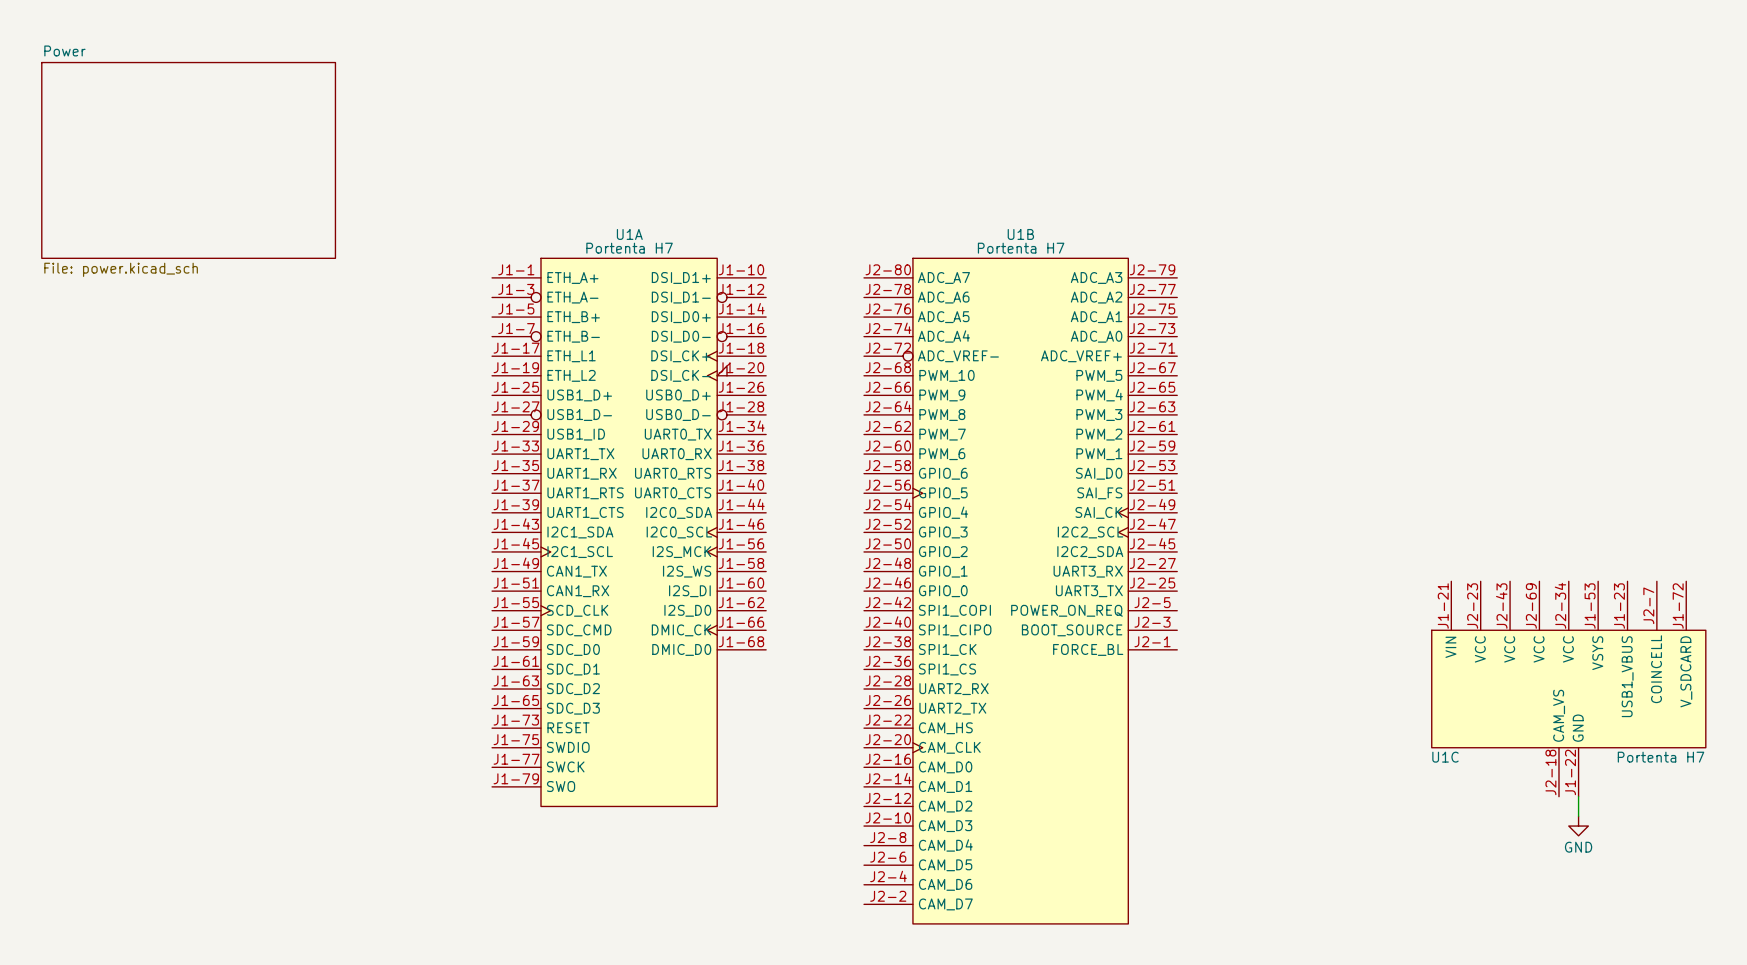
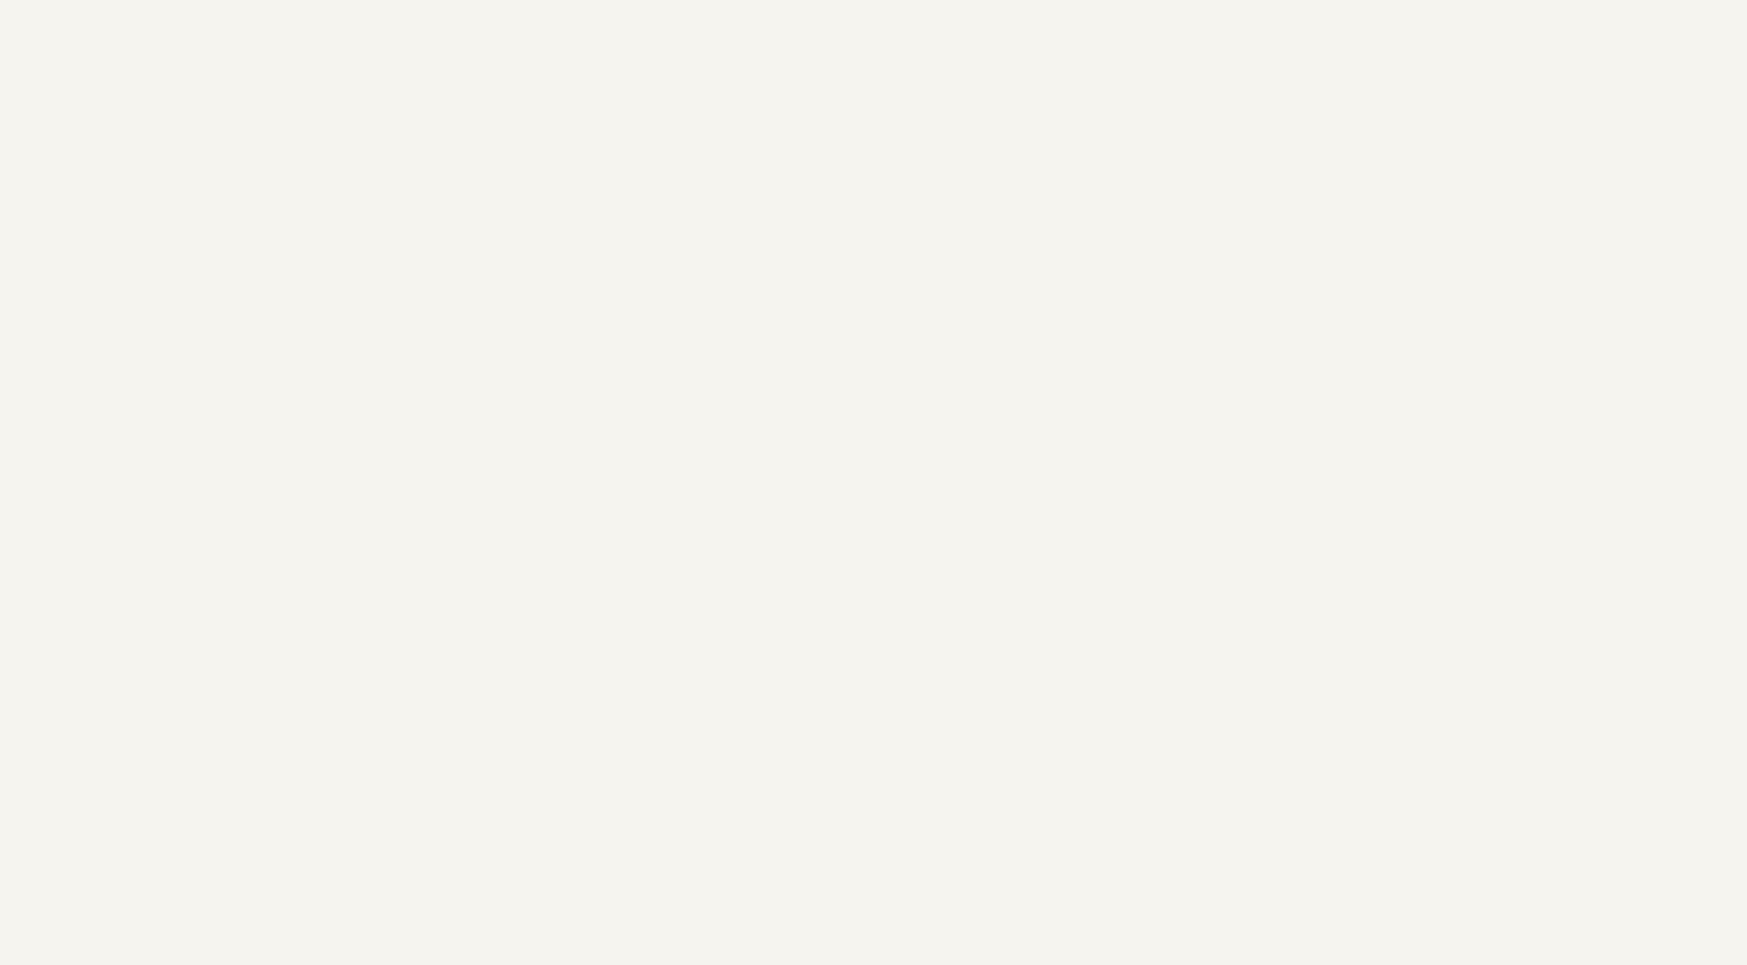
sheet Power: File: power.kicad_sch (188, 160) -> none
U1A: Portenta H7 (629, 532) -> none
U1B: Portenta H7 (1020, 591) -> none
U1C: Portenta H7 (1568, 689) -> none
wire: (1578, 796) (1578, 816) -> none
power symbol: GND (1578, 826) -> none

